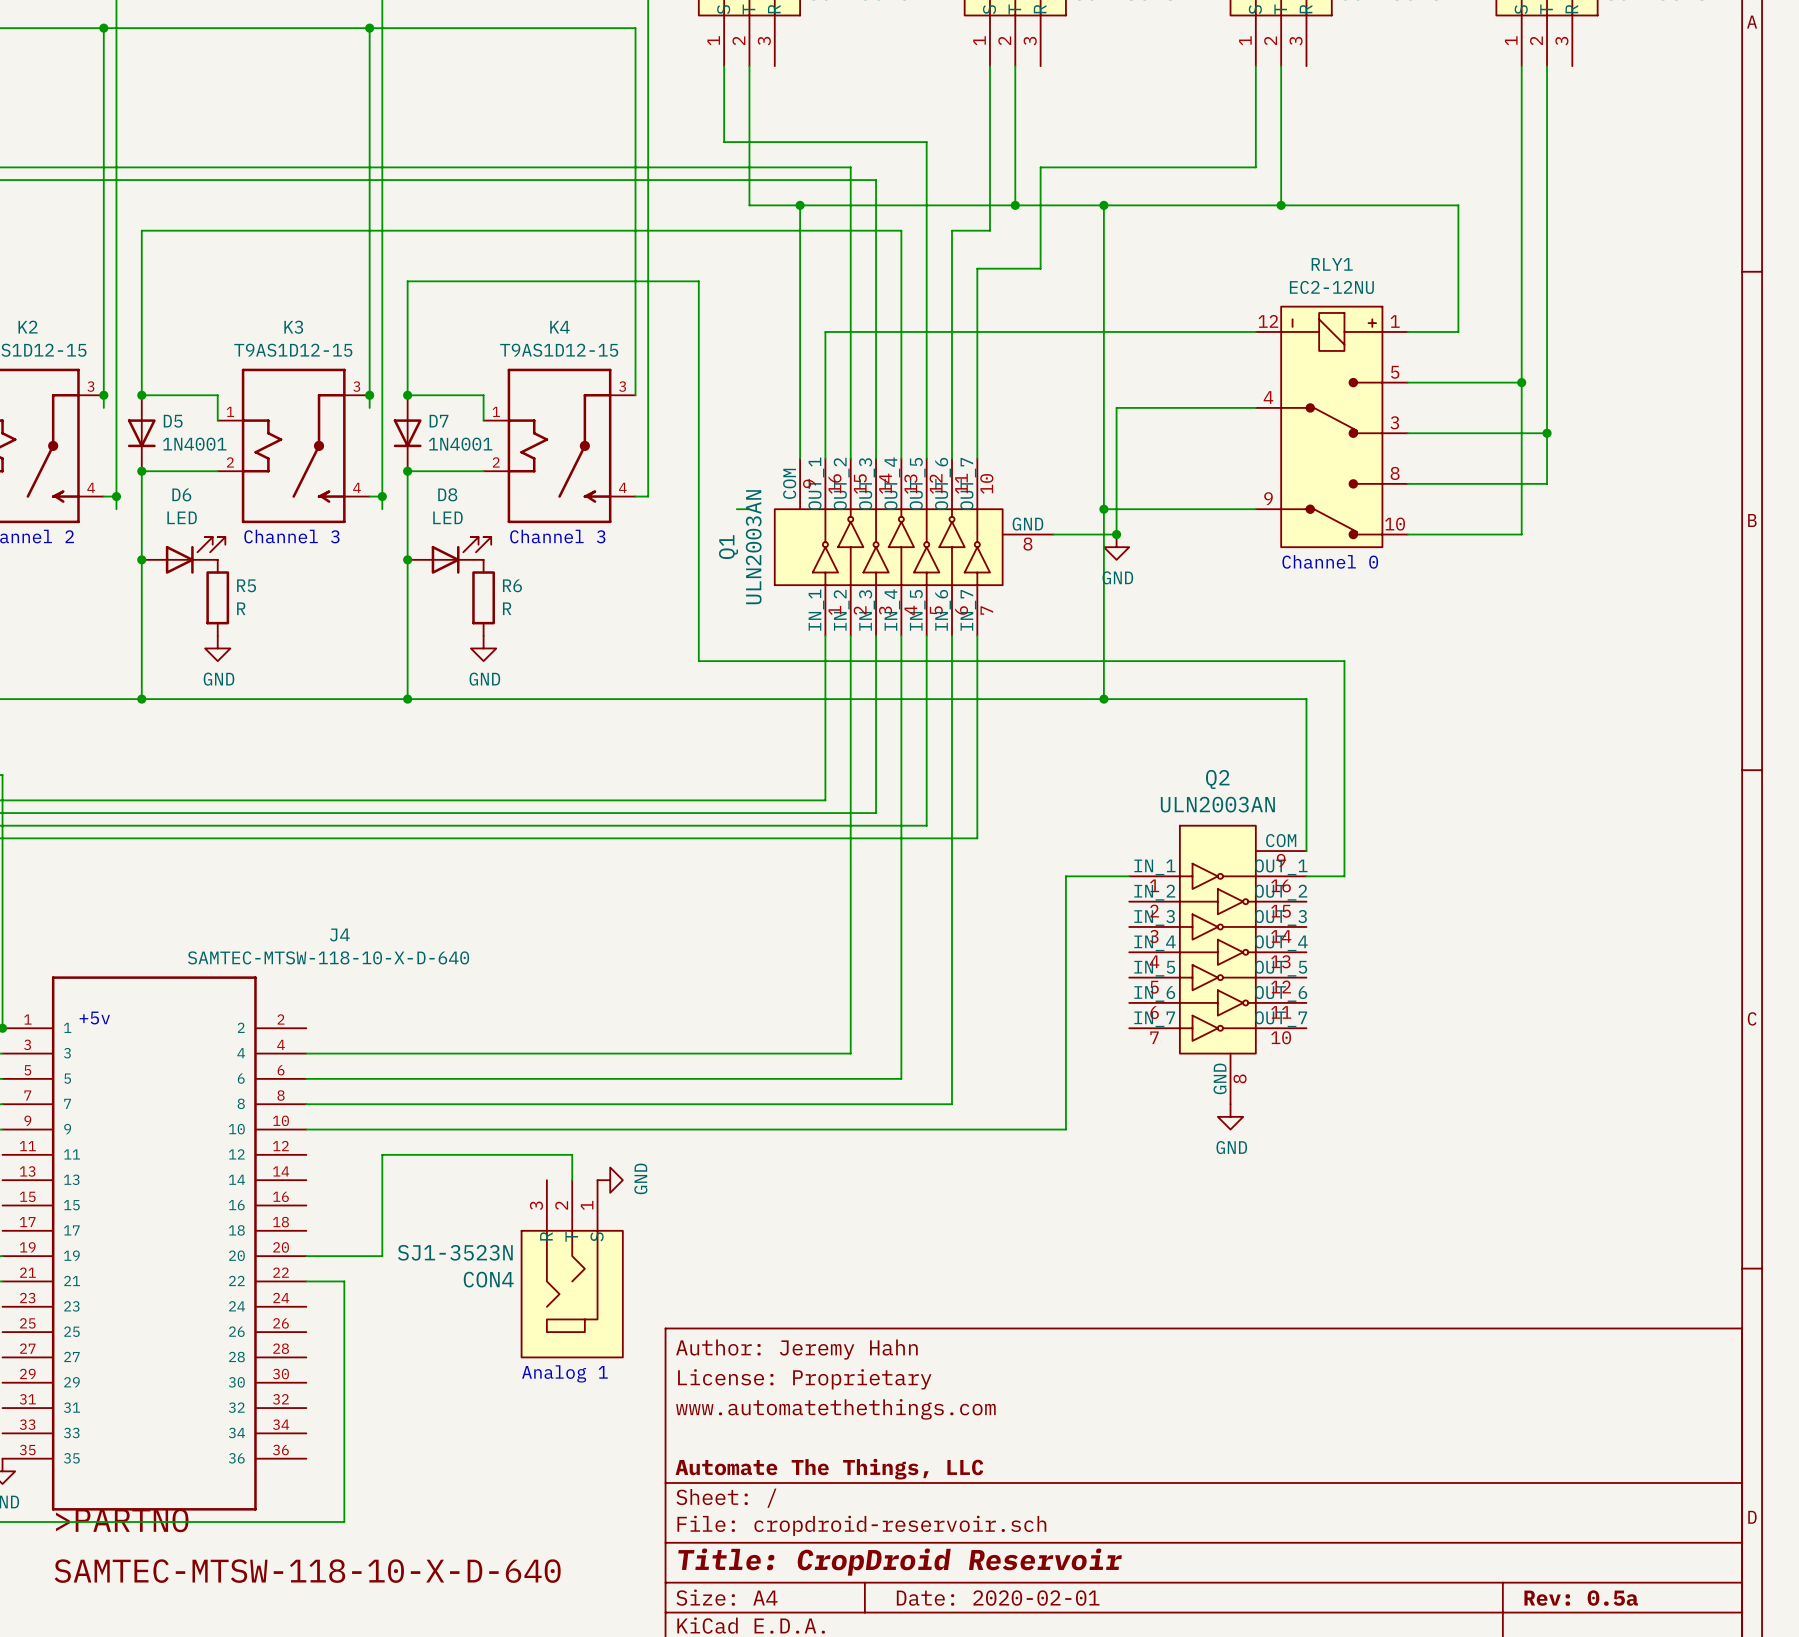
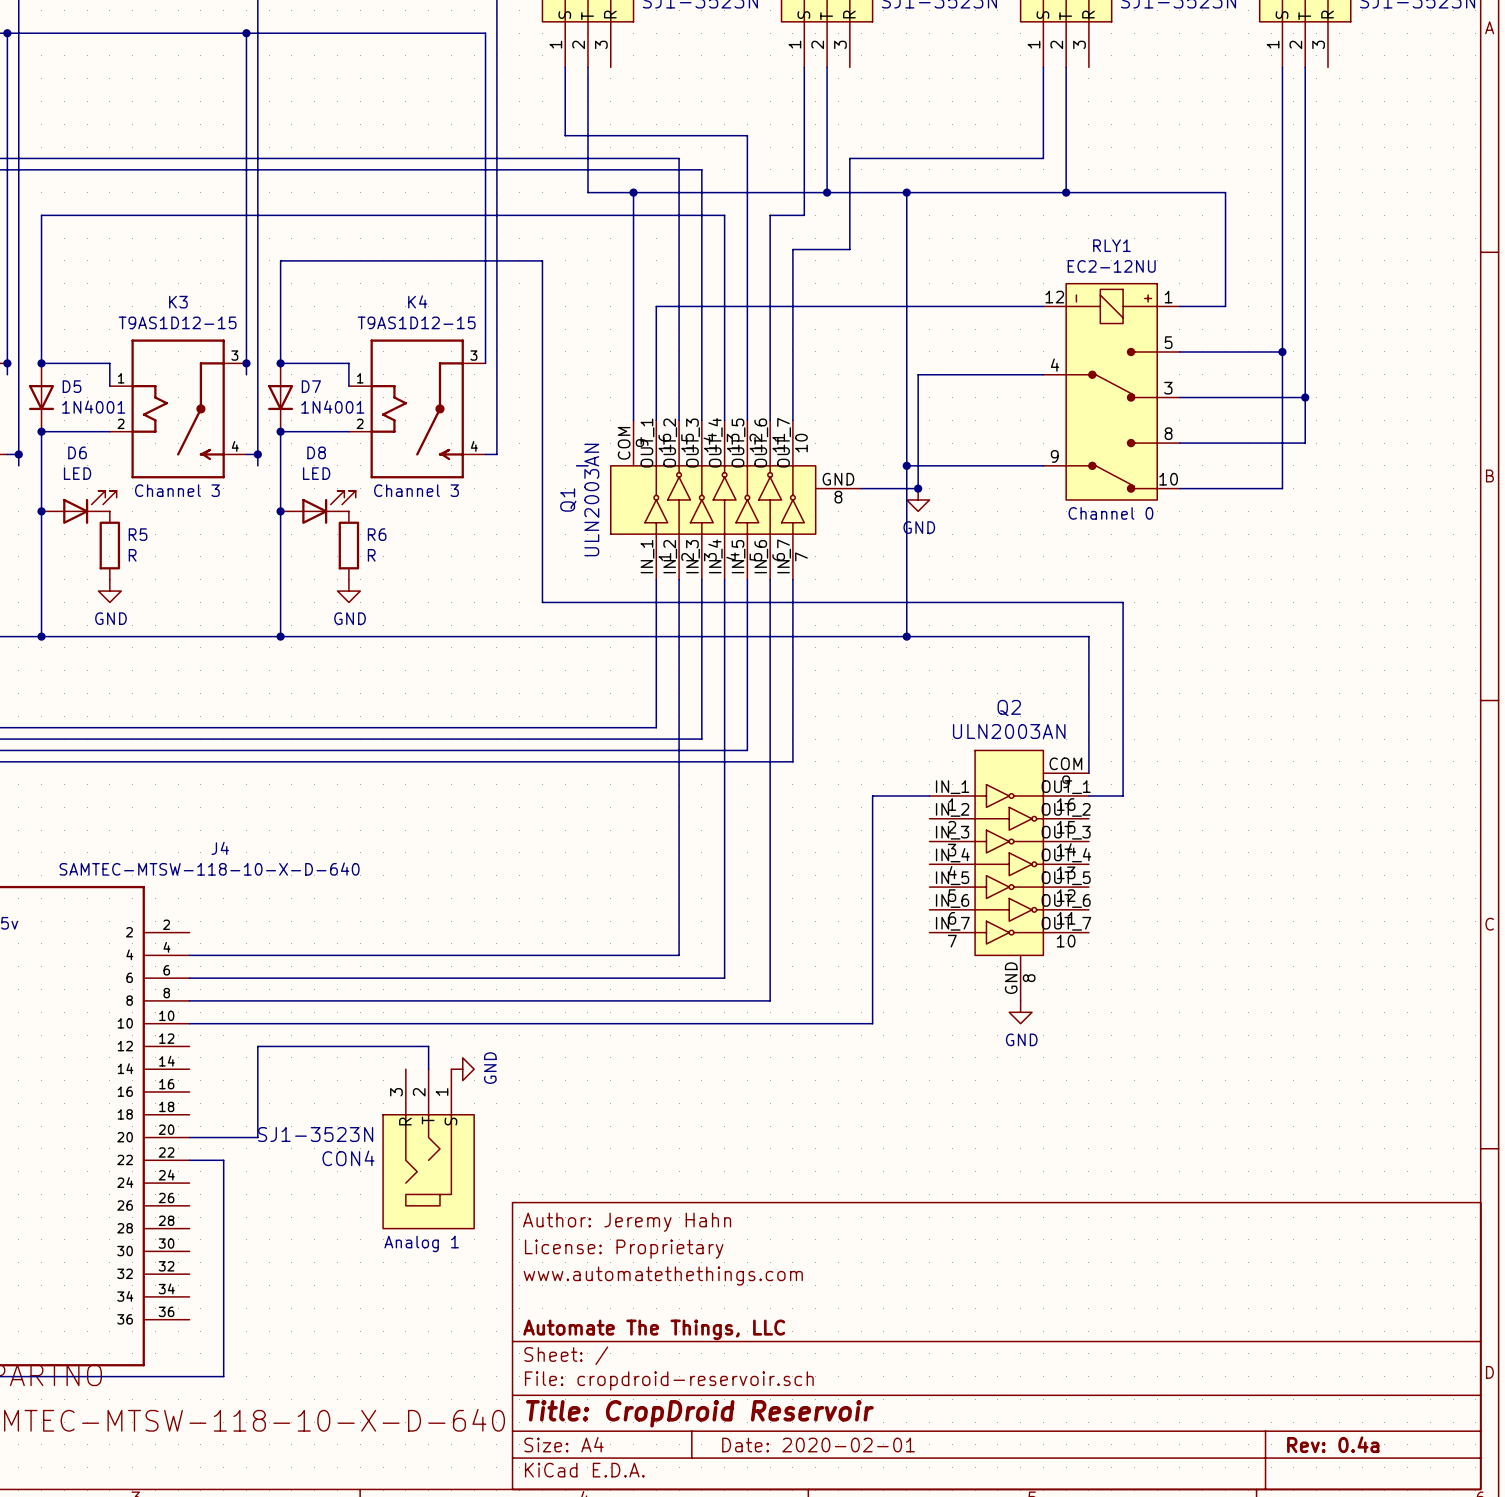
title block: Rev: 0.5a (1581, 1598) -> Rev: 0.4a (1333, 1444)

